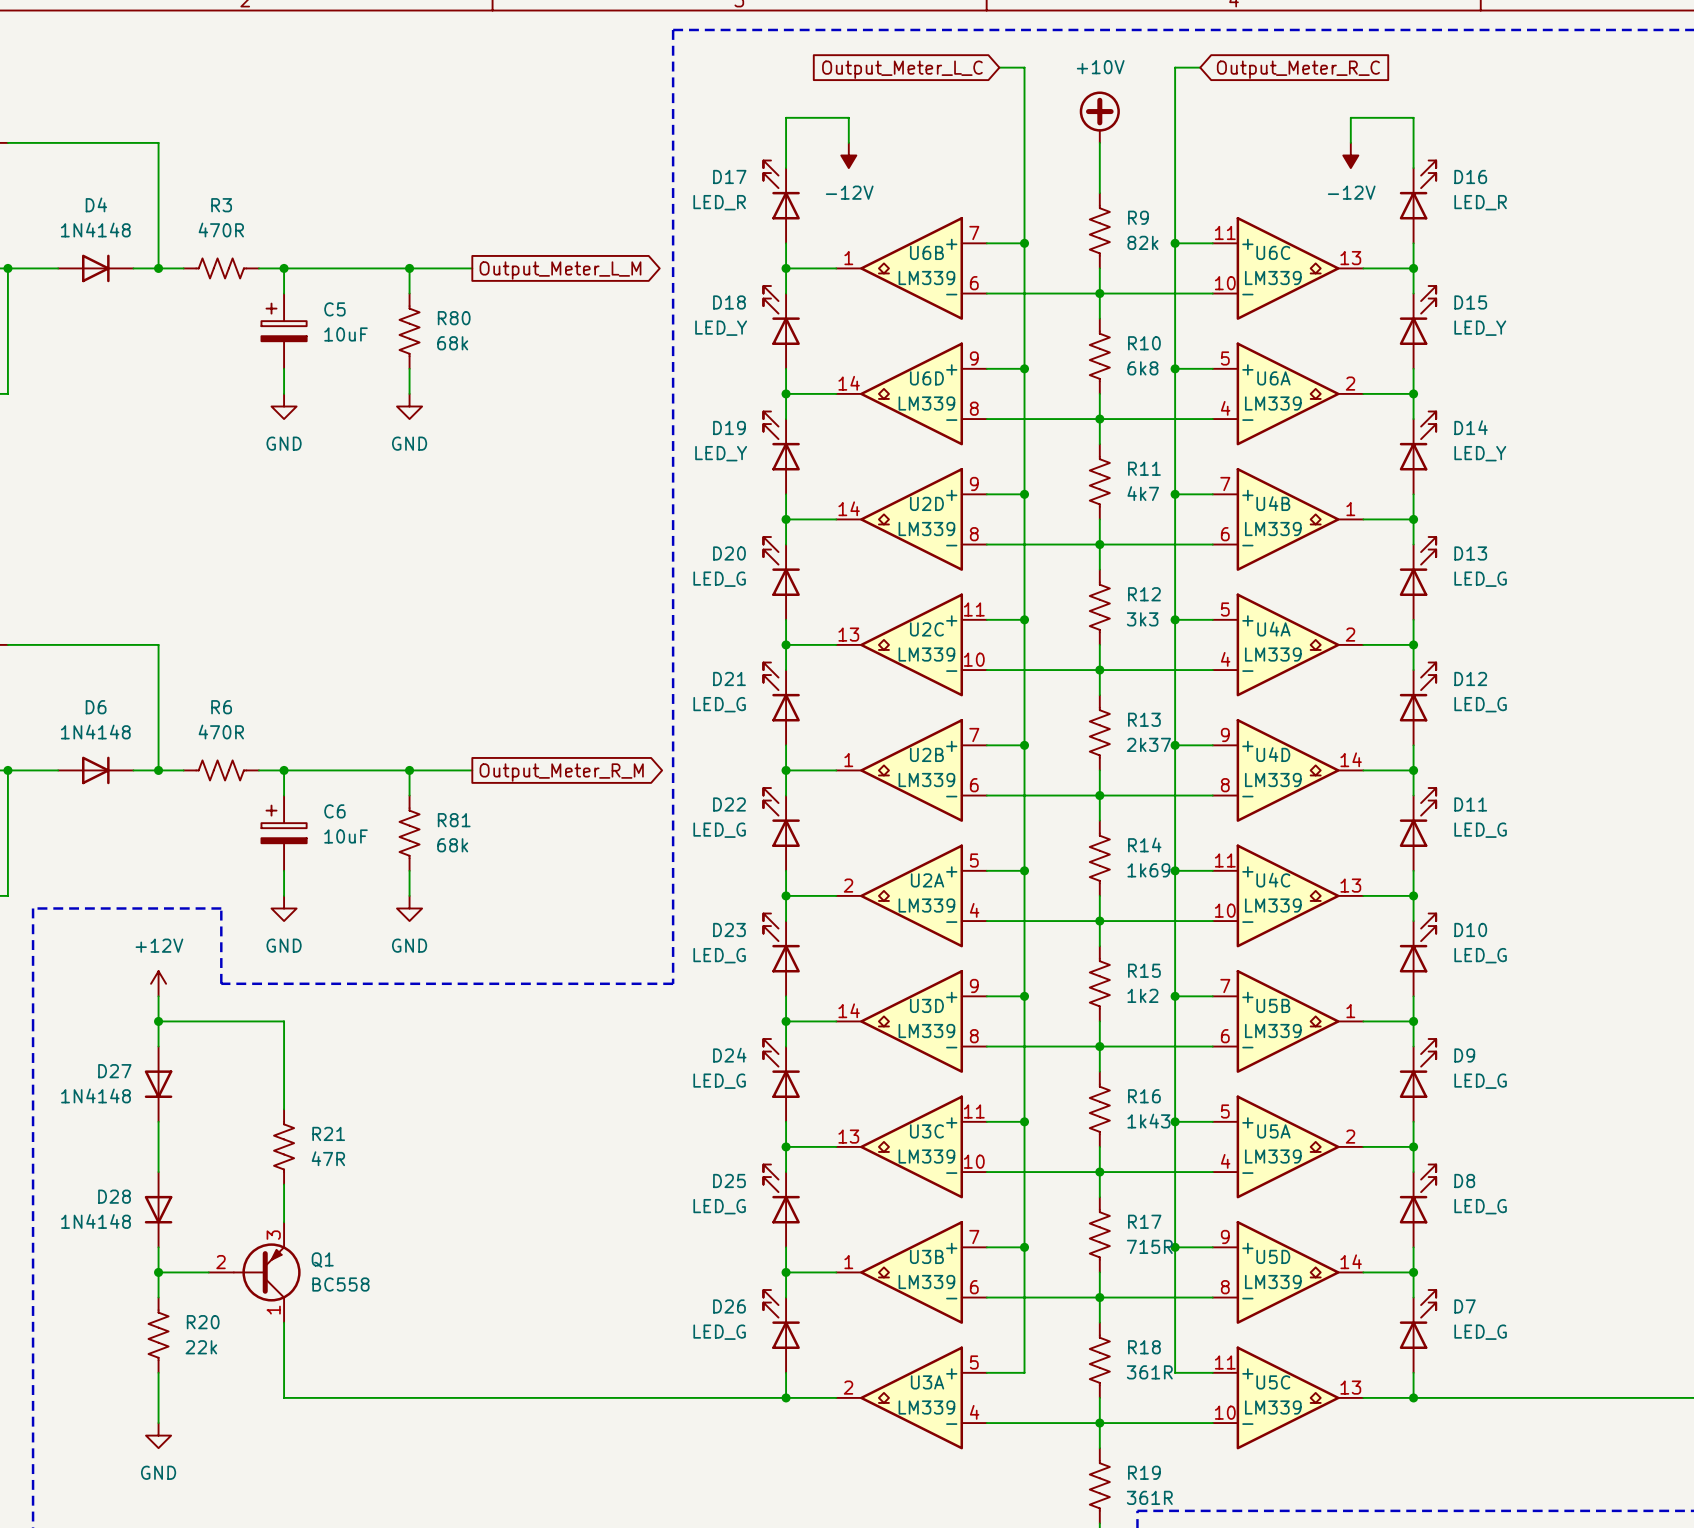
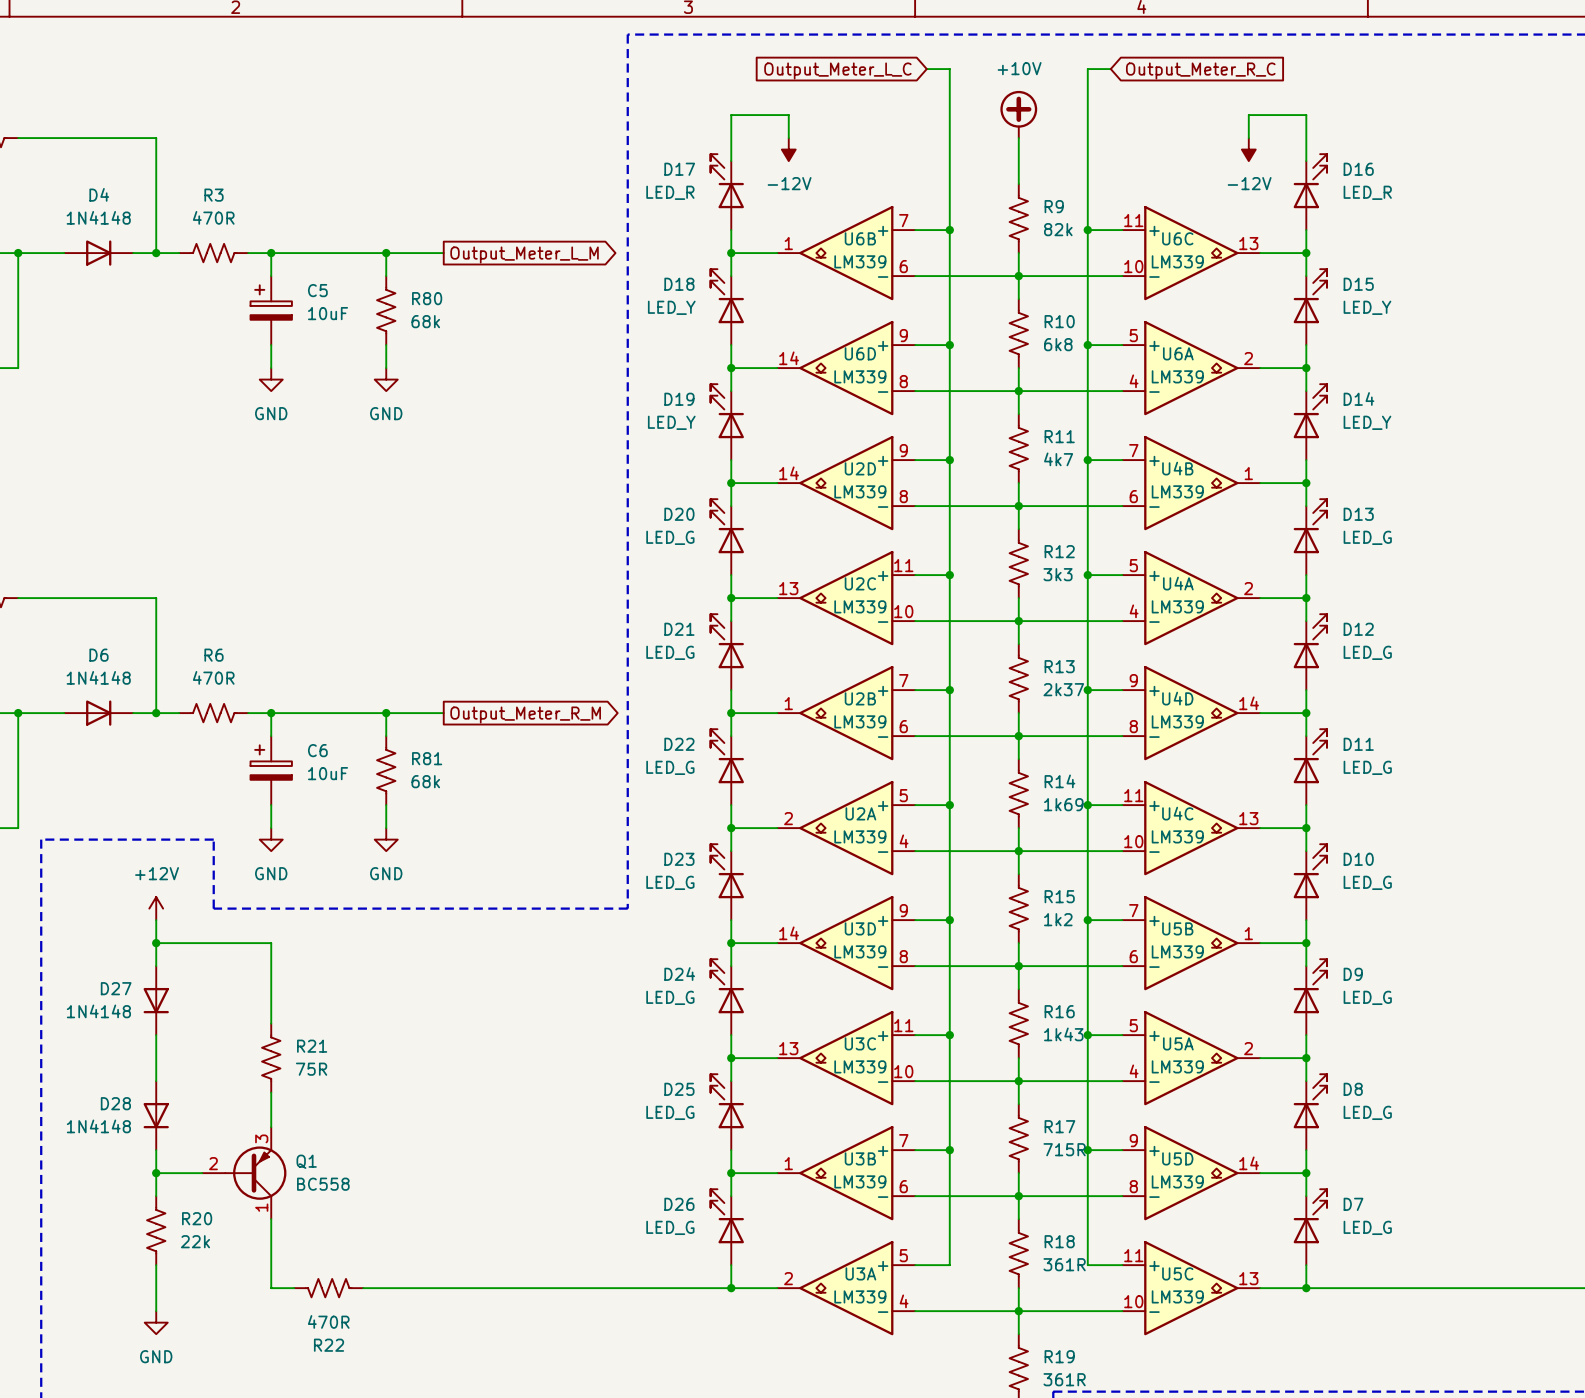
R21 value: 47R (328, 1158) -> 75R (311, 1069)
R22: none -> 470R (328, 1288)

